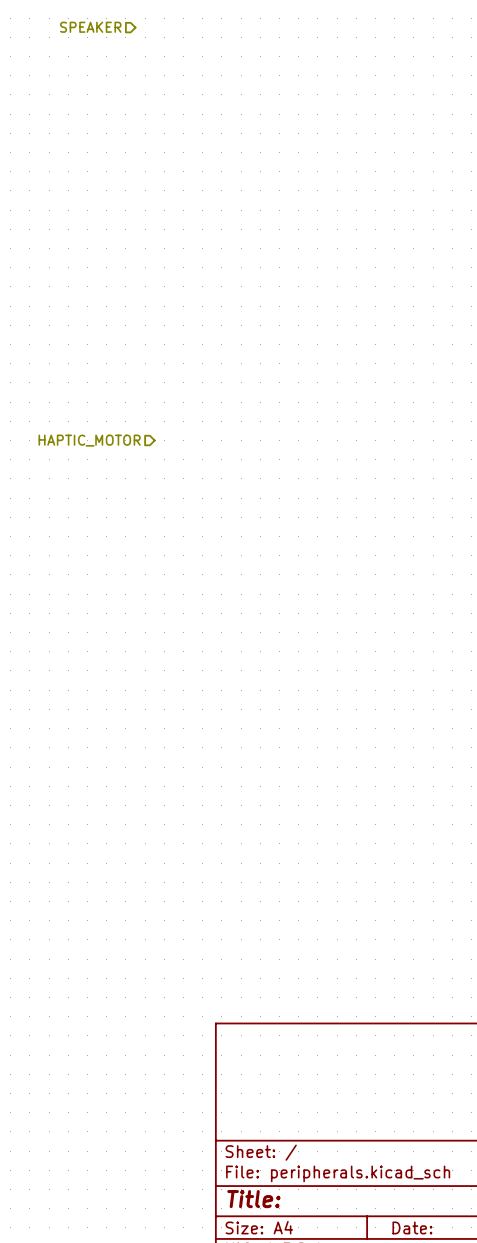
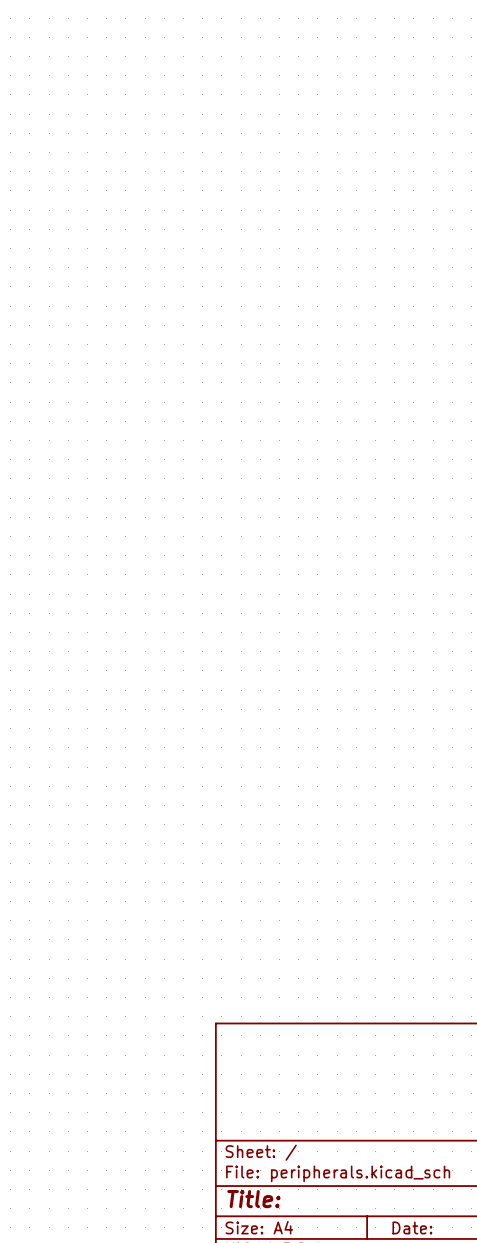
hierarchical label: SPEAKER (90, 27) -> none
hierarchical label: HAPTIC_MOTOR (89, 440) -> none

